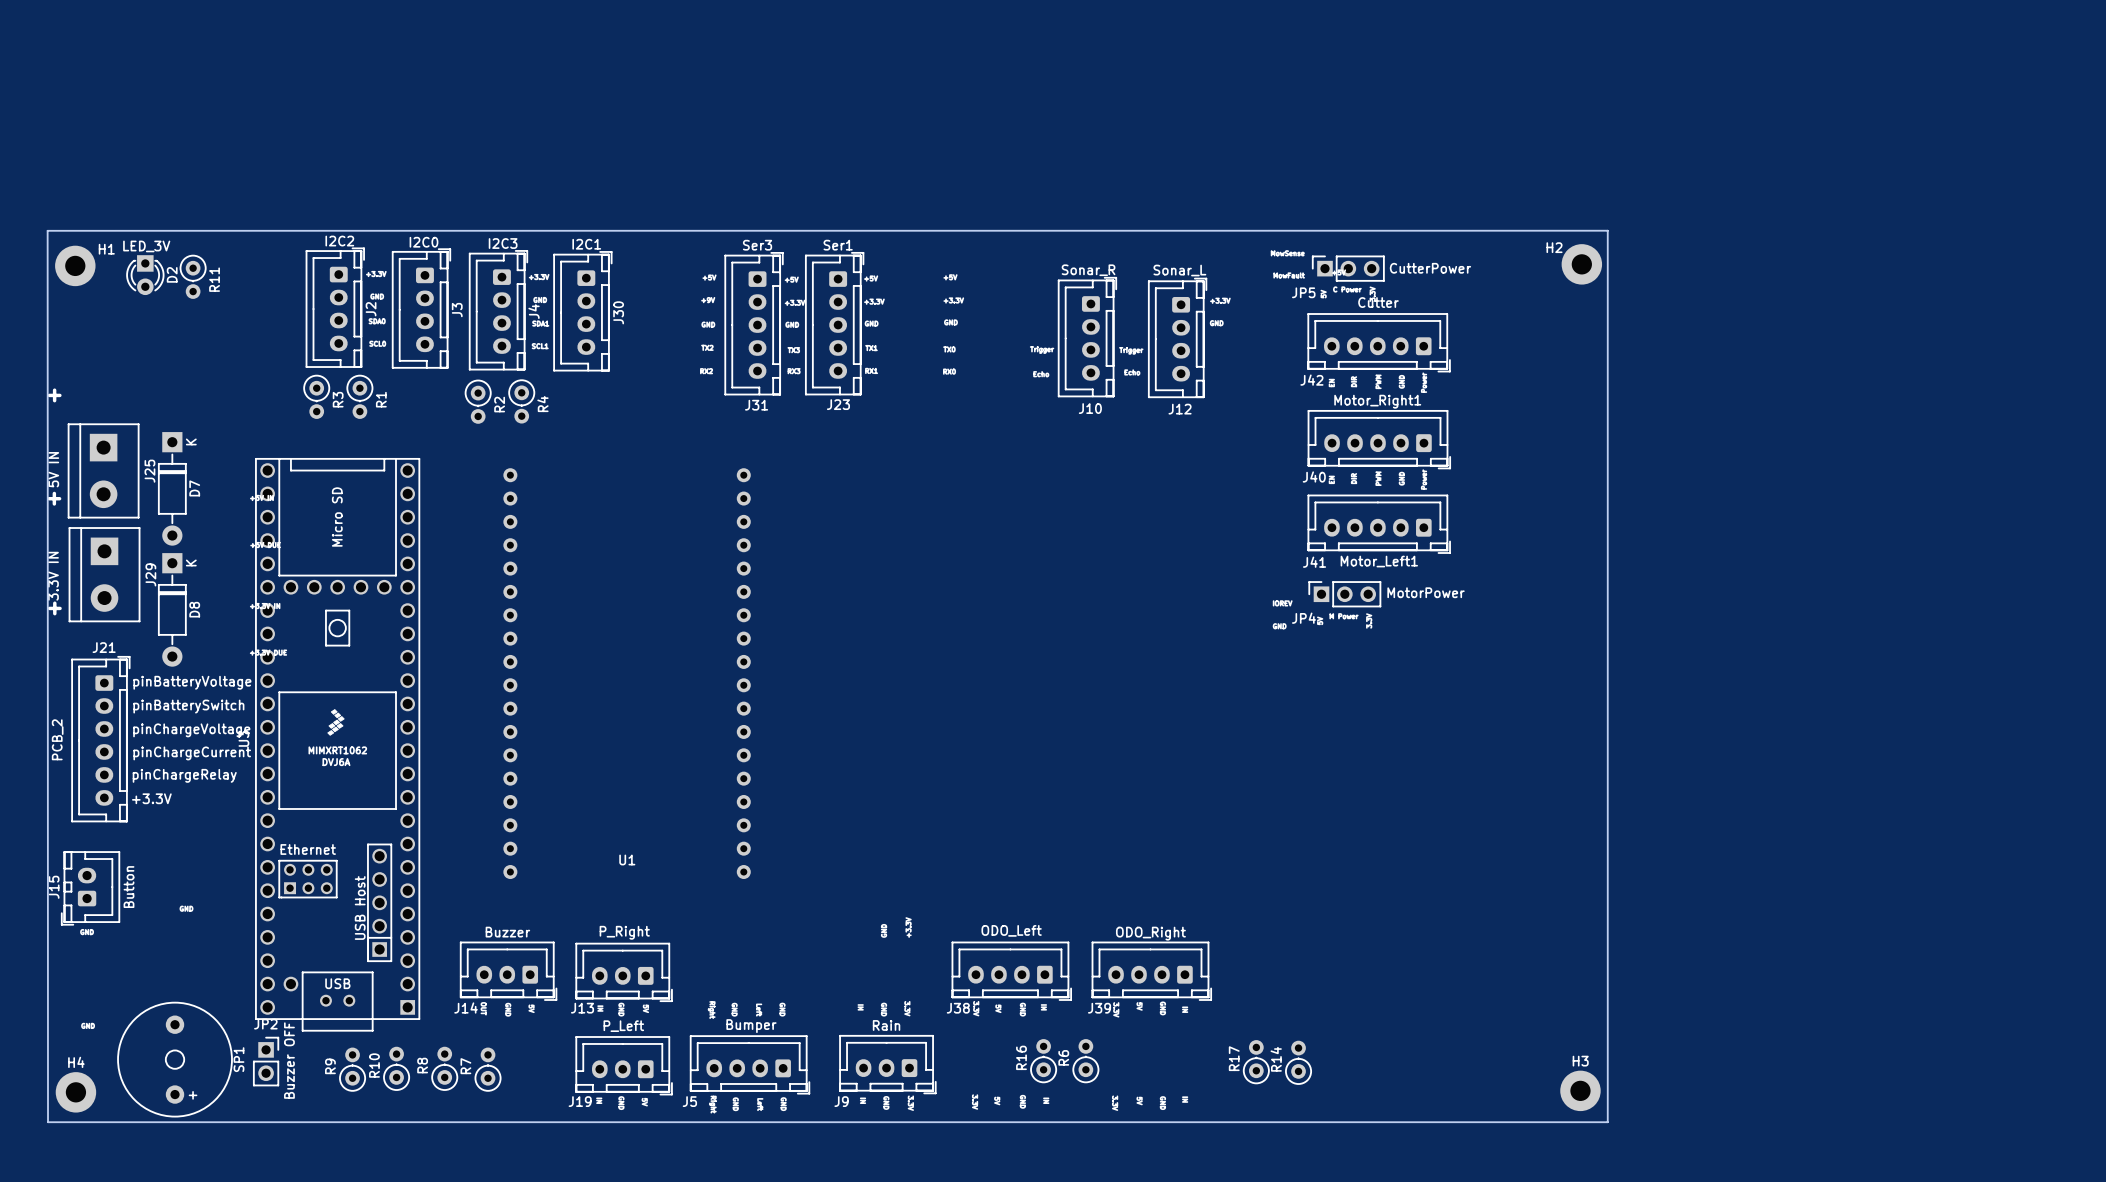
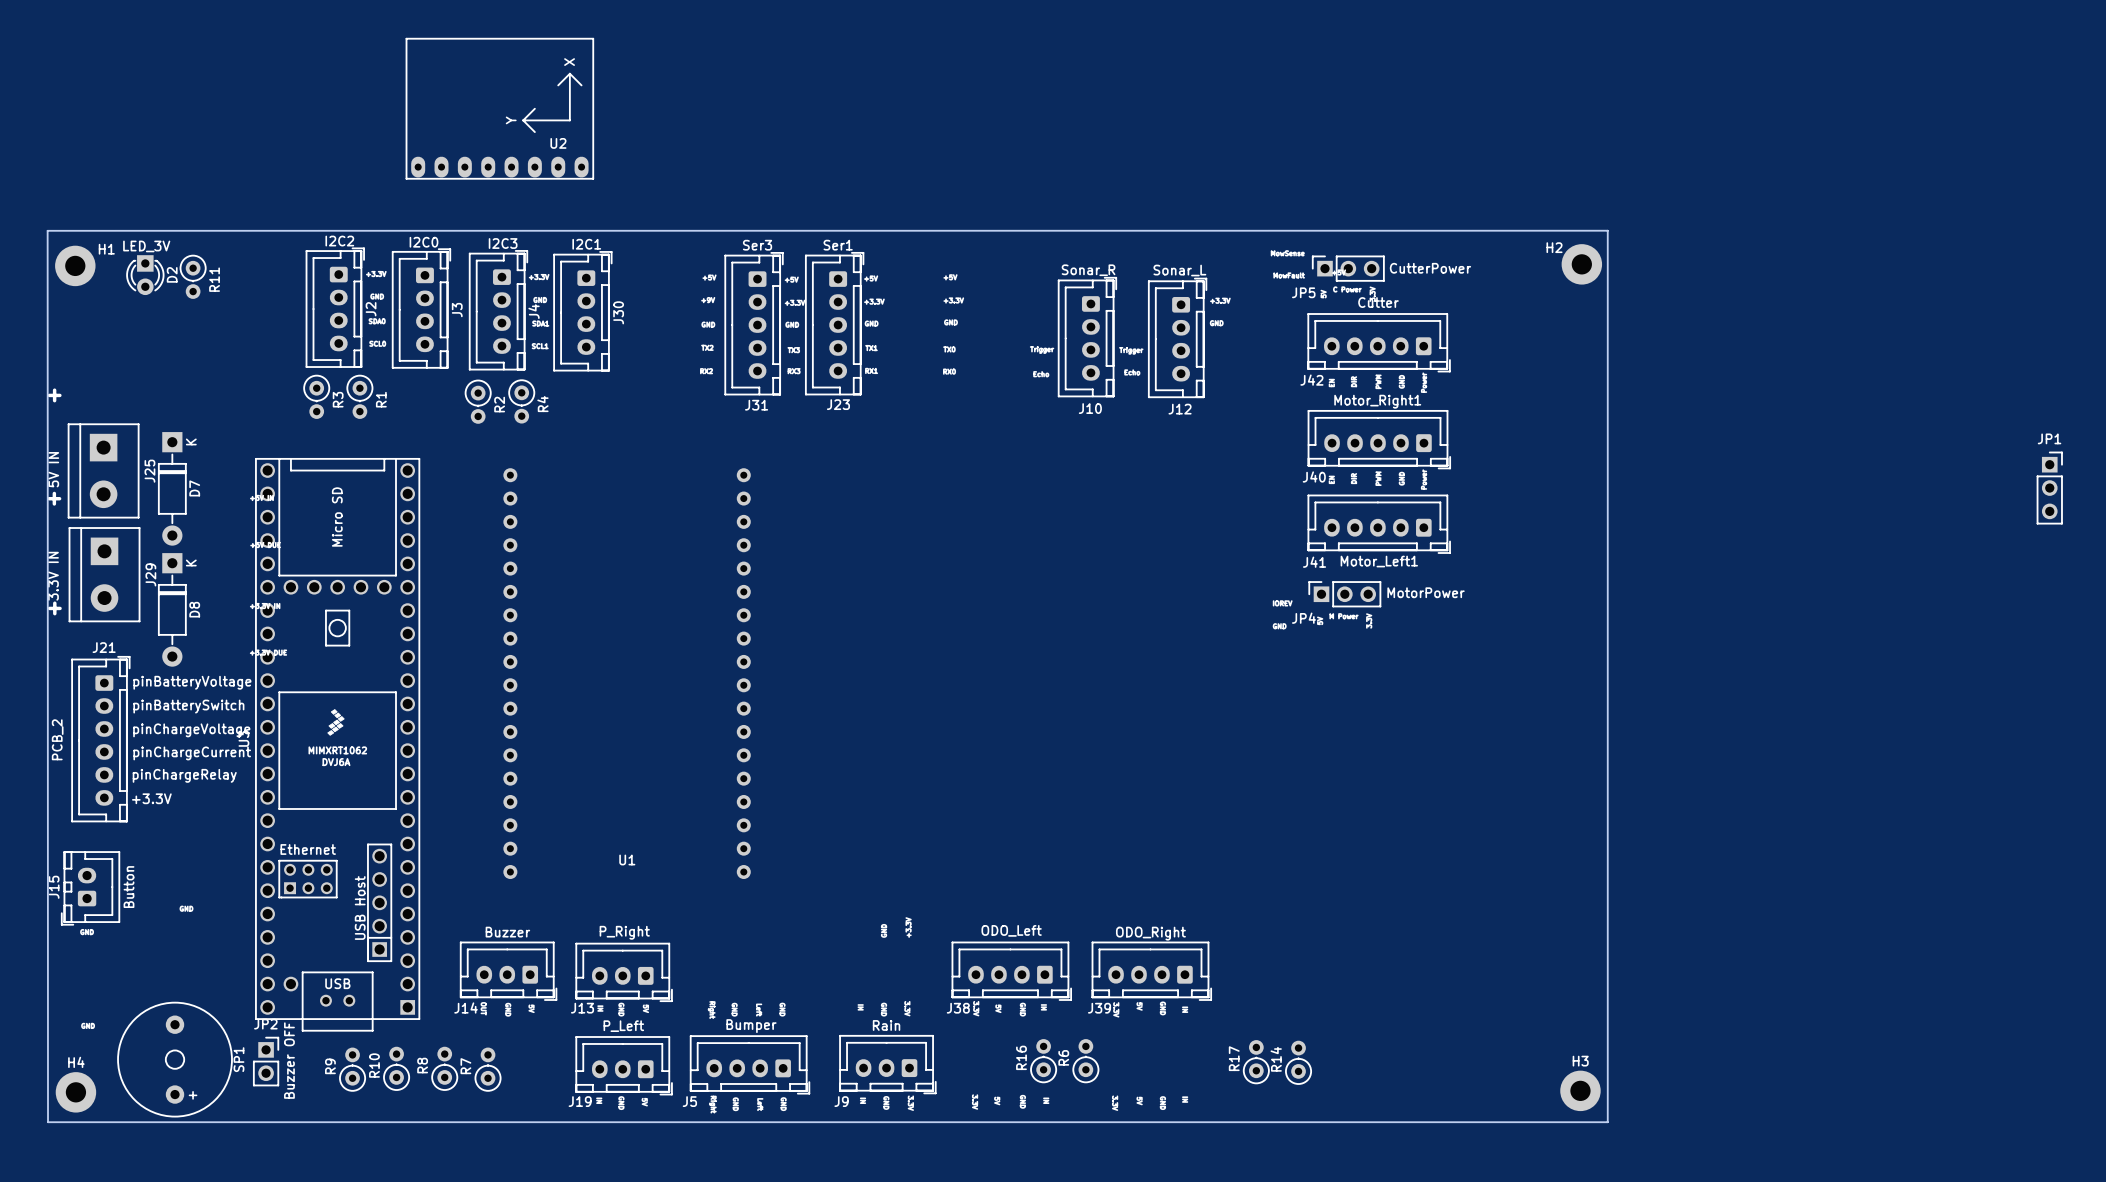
U2: none -> (499, 108)
JP1: none -> (2049, 488)

